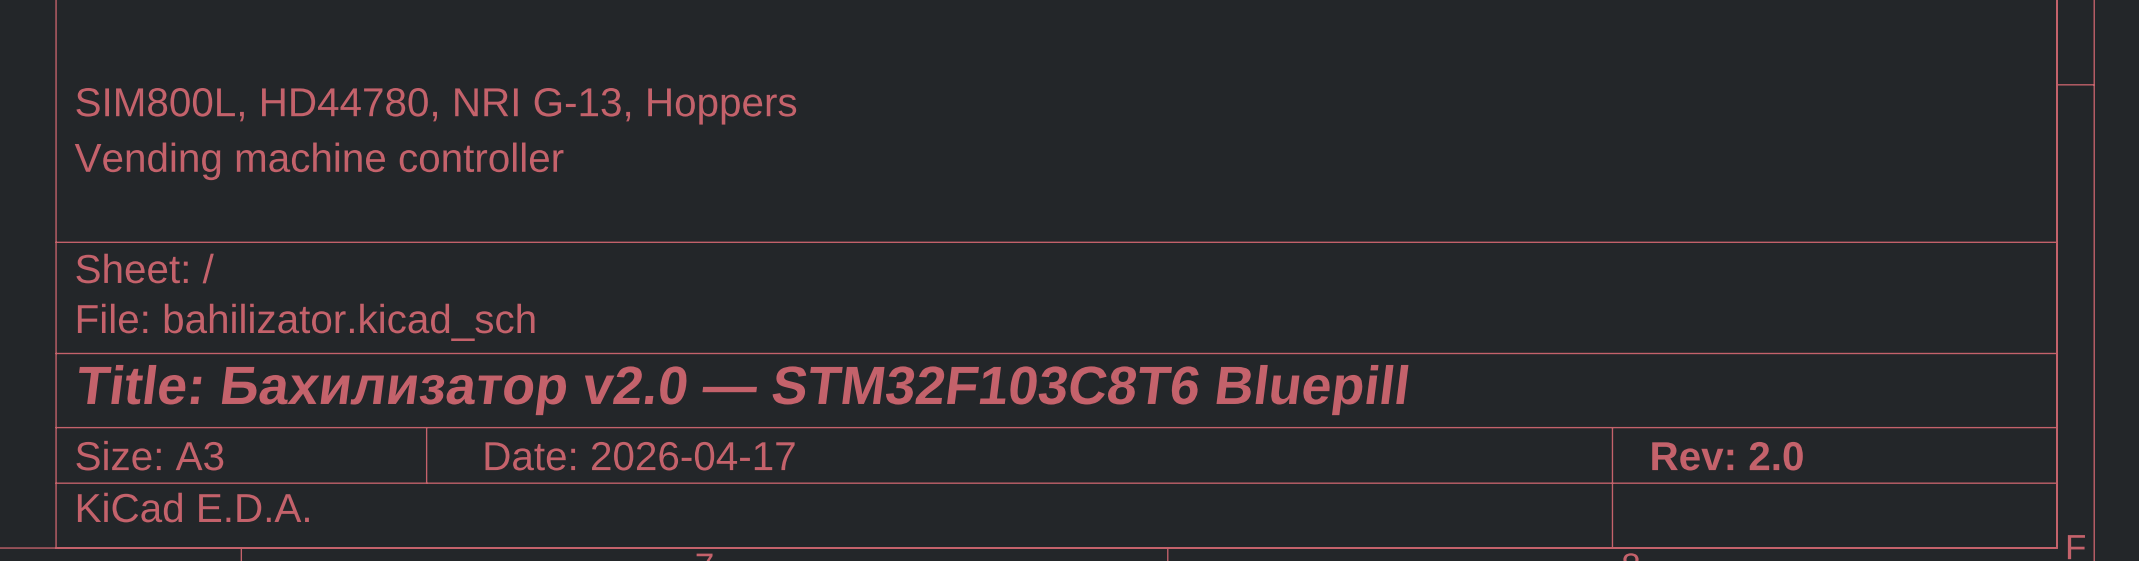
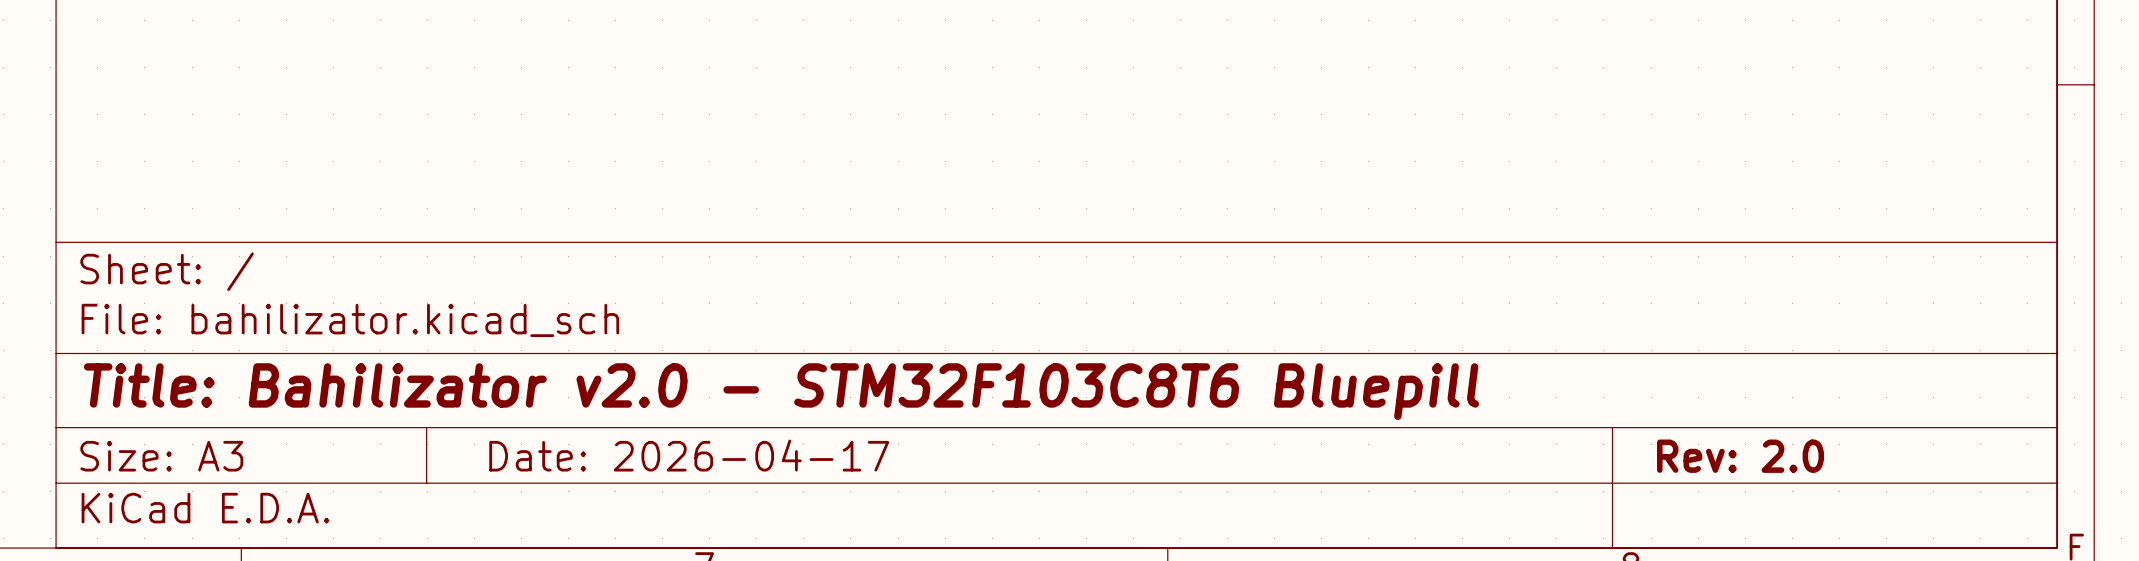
title block: SIM800L, HD44780, NRI G-13, Hoppers (436, 106) -> none
title block: Vending machine controller (319, 161) -> none
title block: Title: Бахилизатор v2.0 — STM32F103C8T6 Bluepill (743, 390) -> Title: Bahilizator v2.0 - STM32F103C8T6 Bluepill (781, 391)

